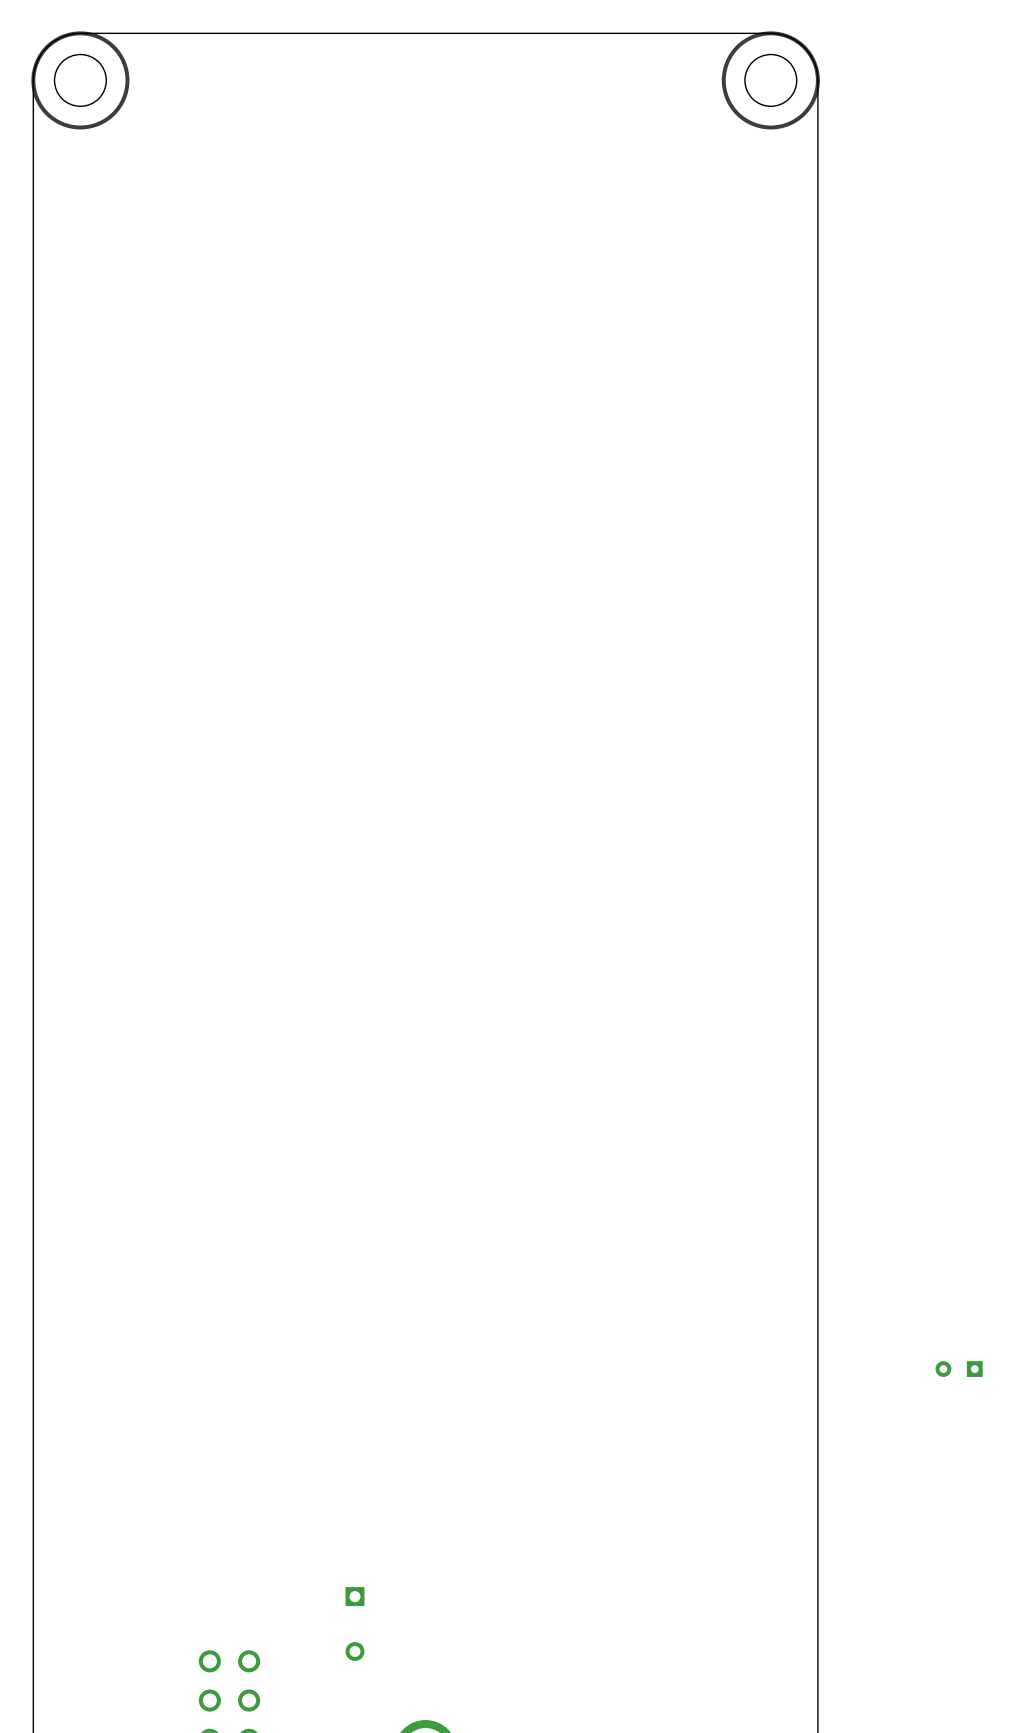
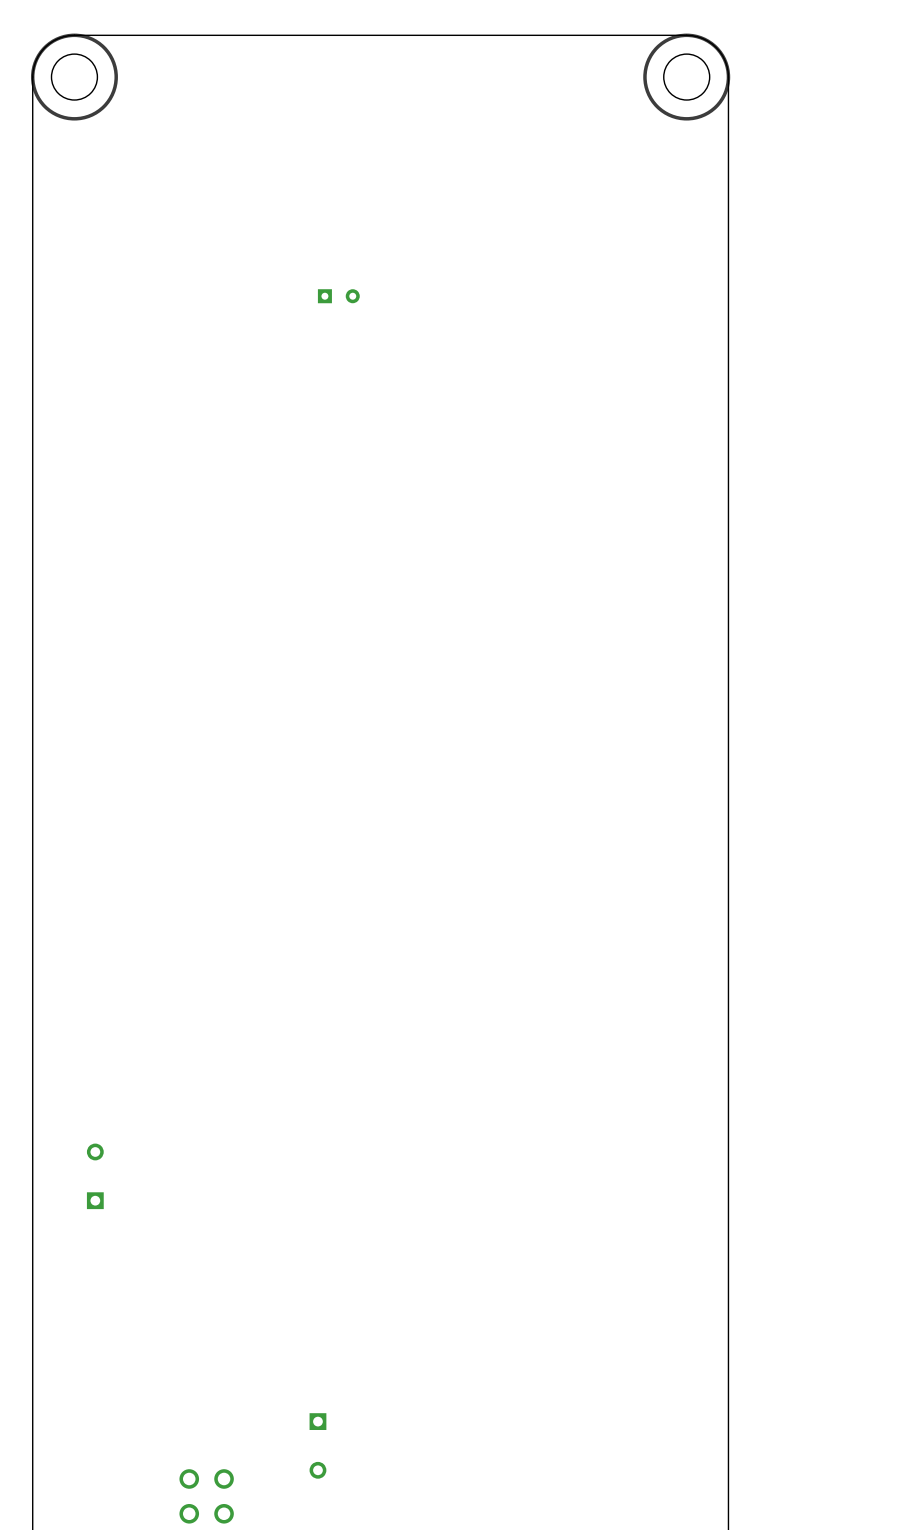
part: none -> (338, 296)
part: none -> (95, 1176)
part: (959, 1369) -> none

